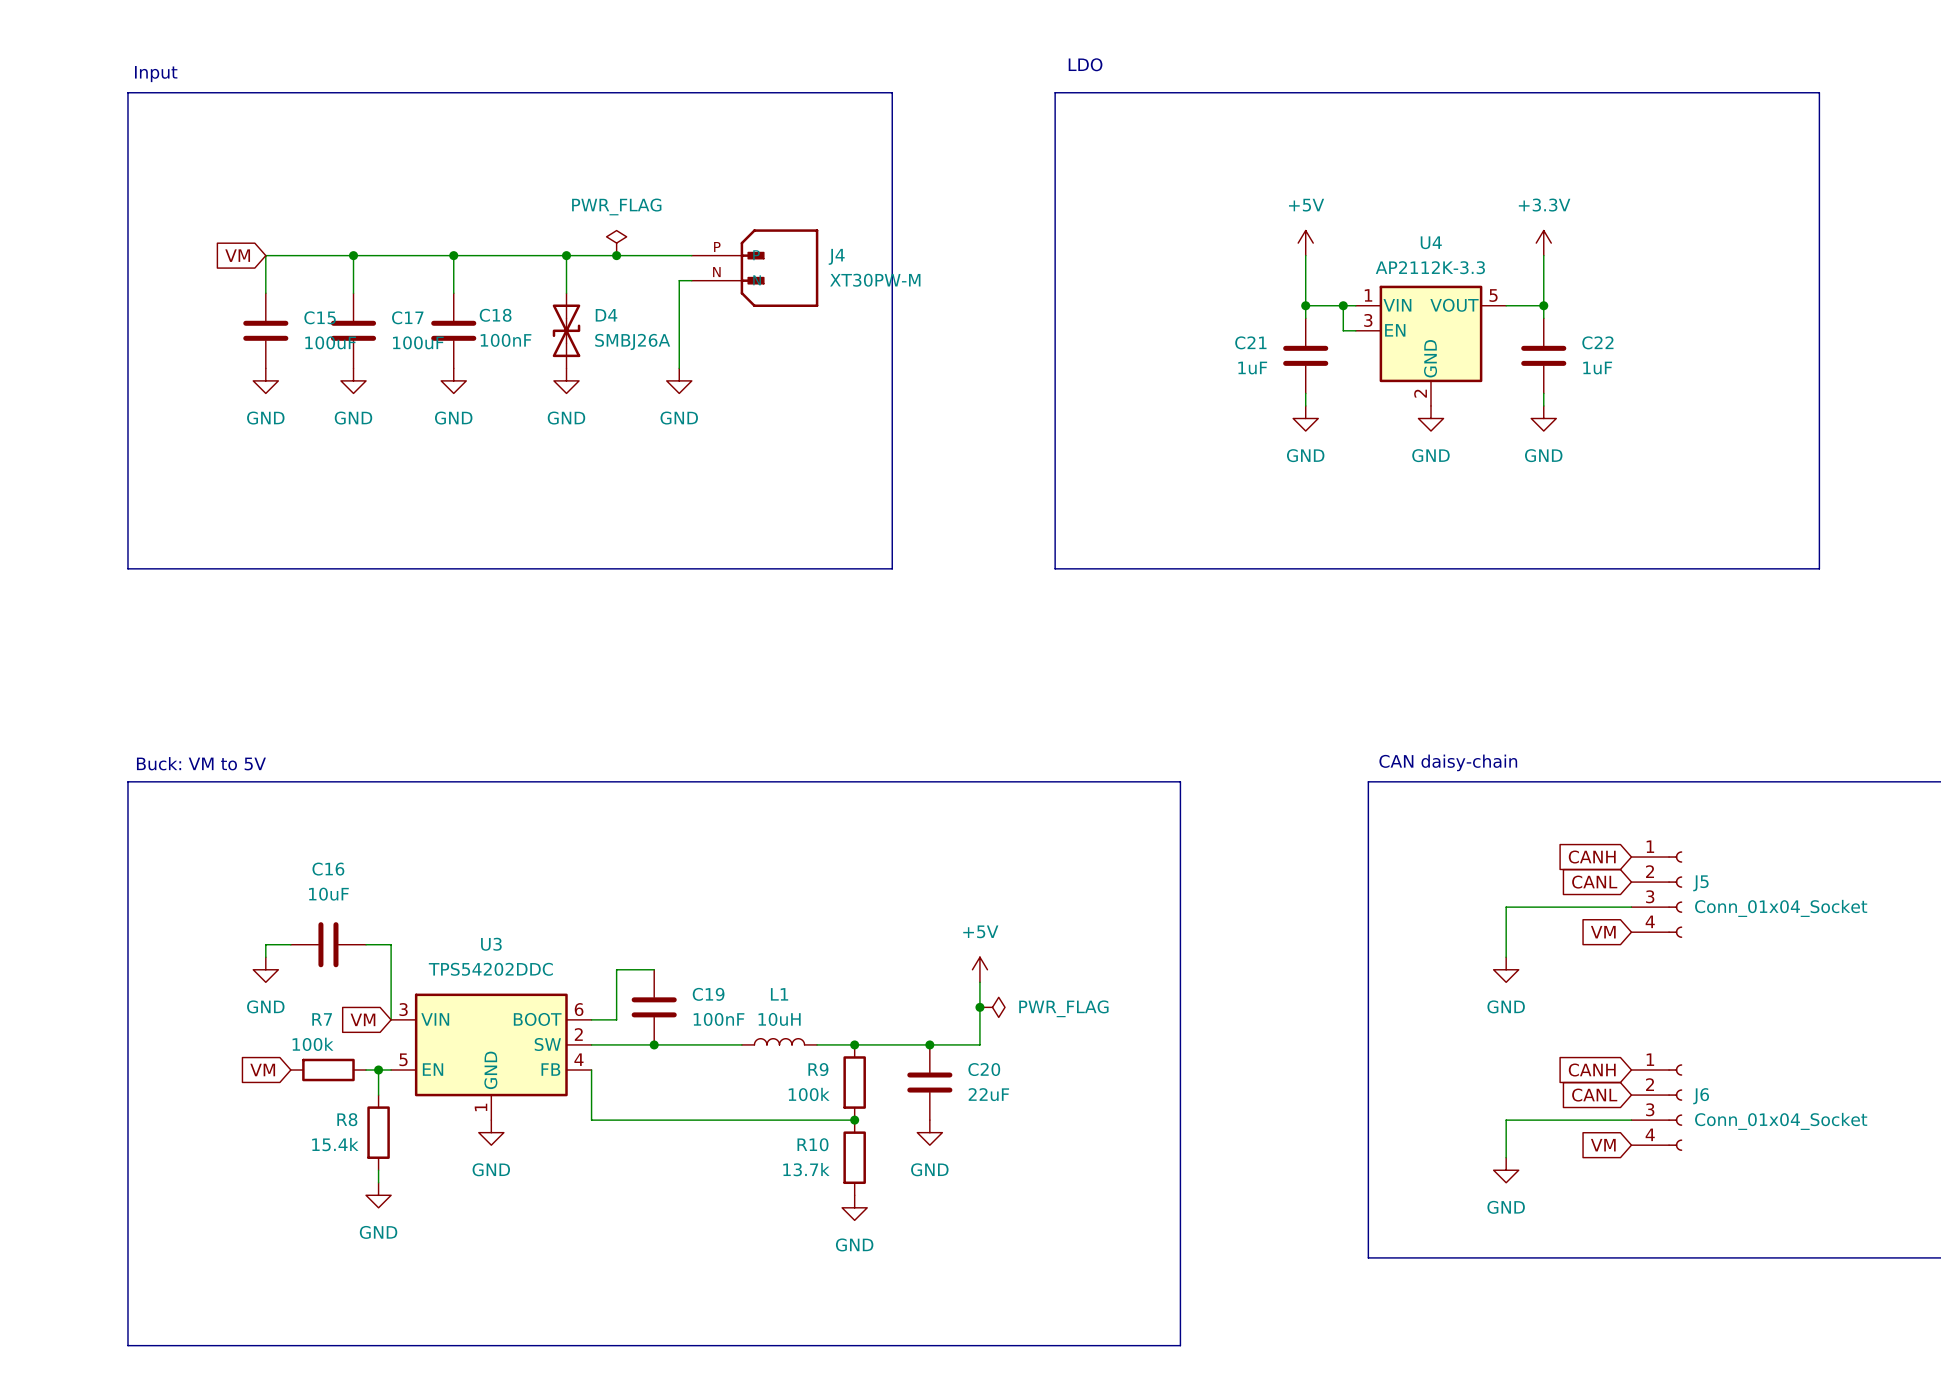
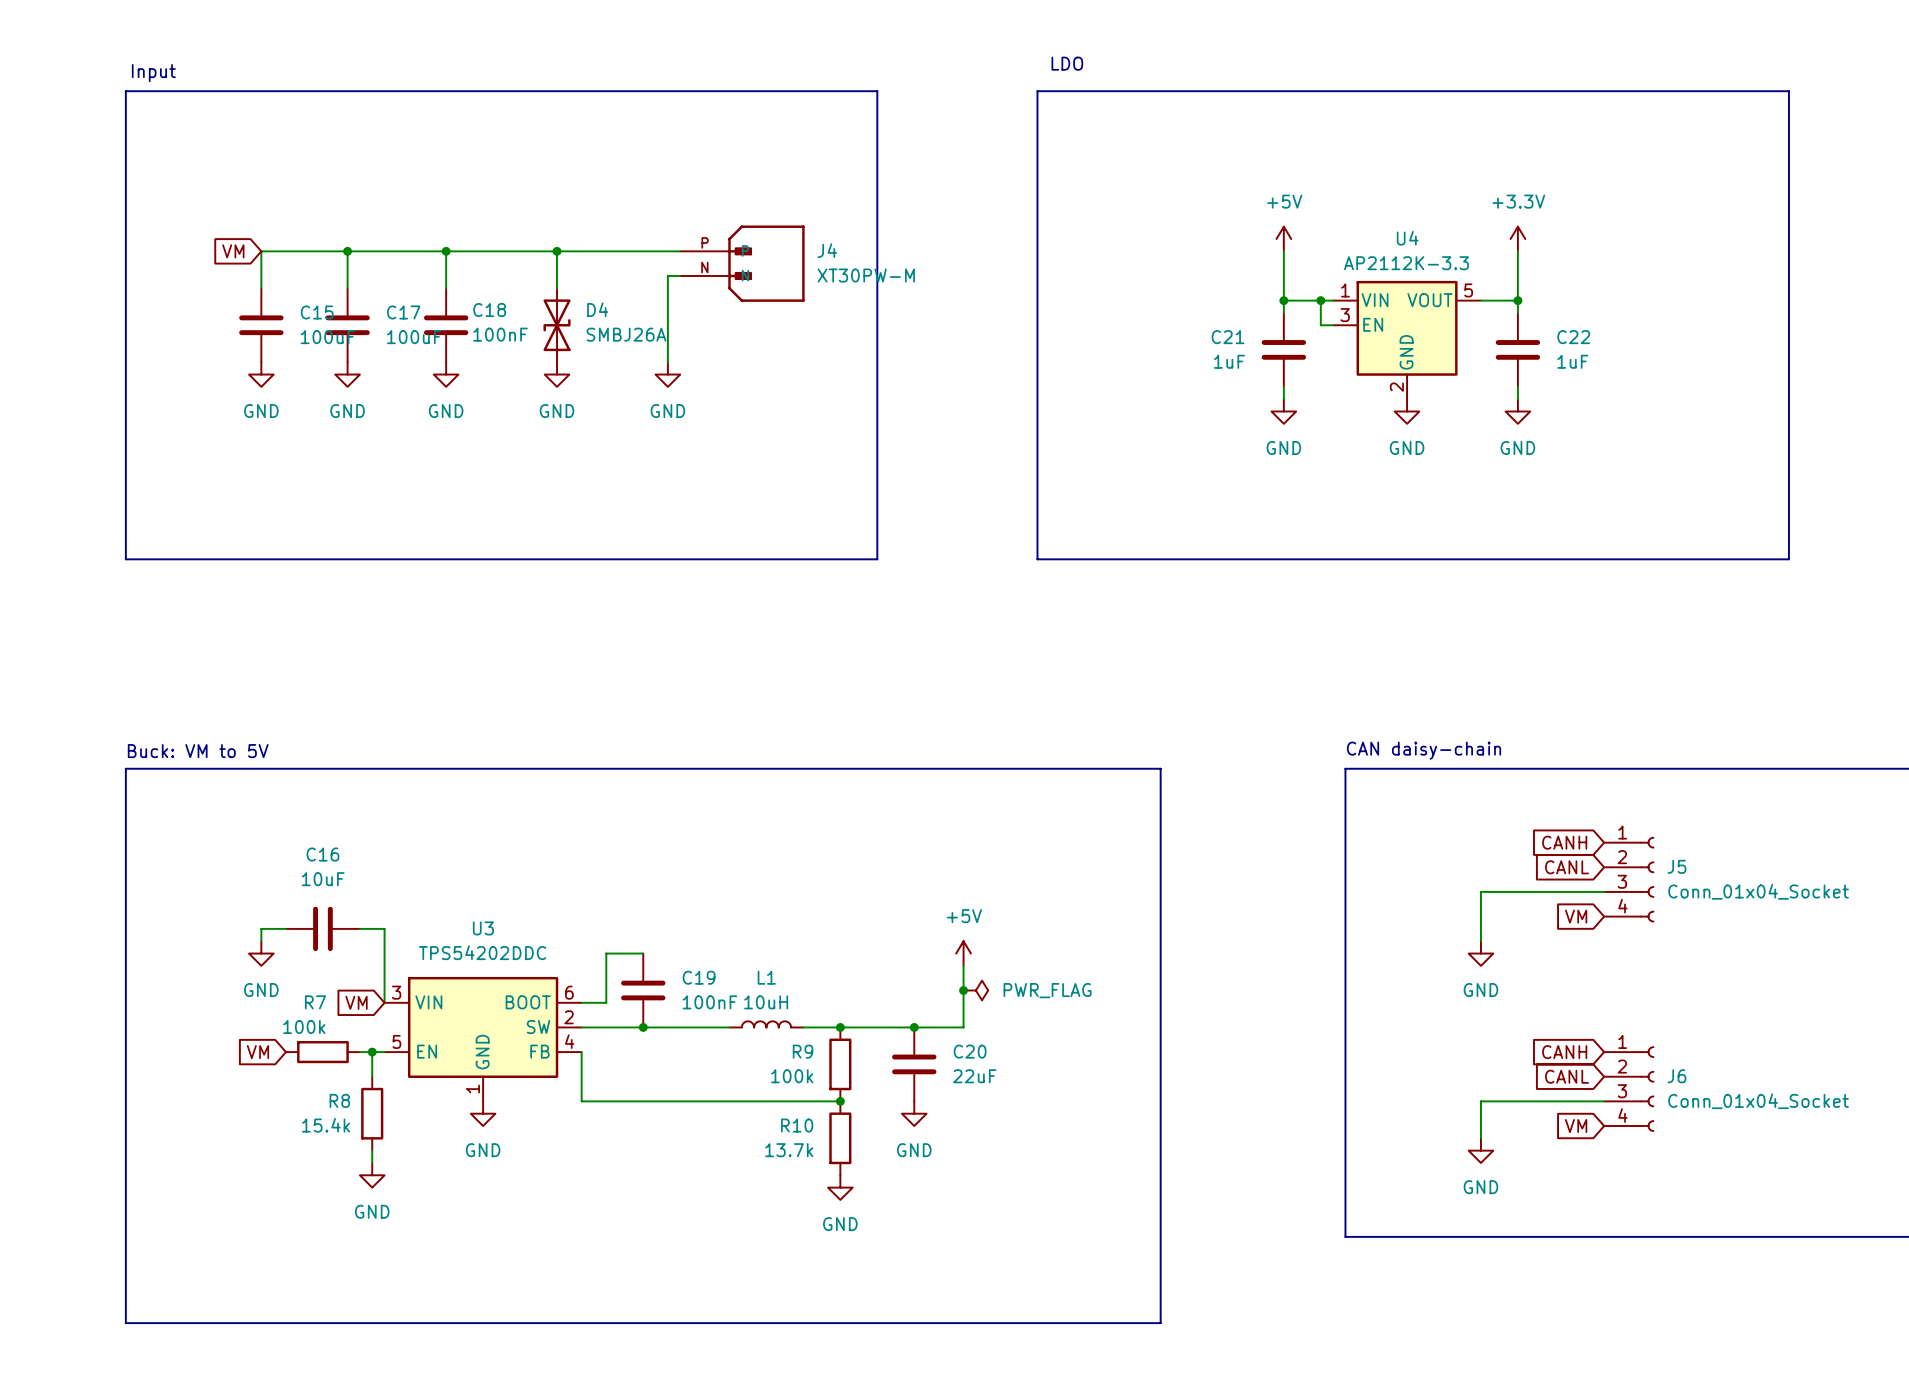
power symbol: PWR_FLAG (616, 243) -> none
junction: (616, 255) -> none

